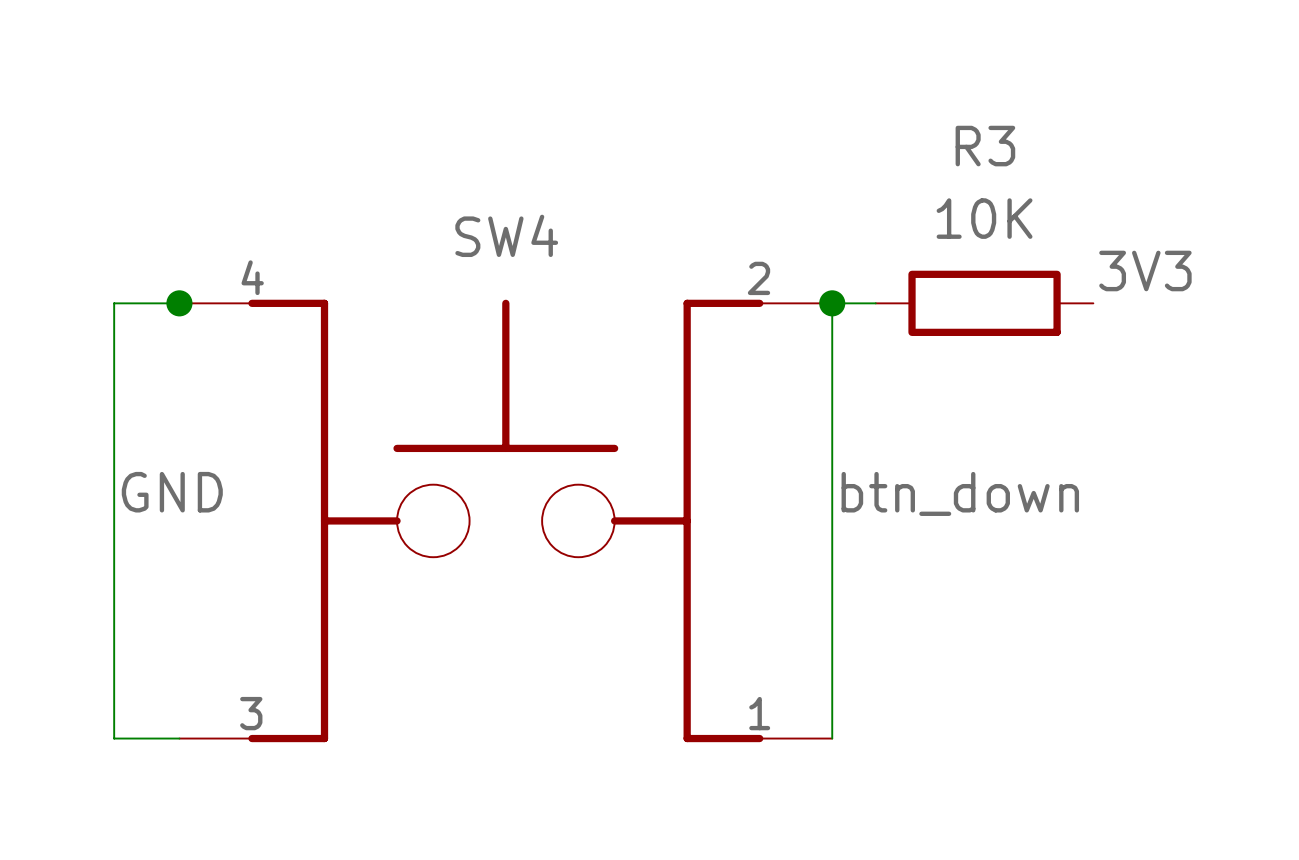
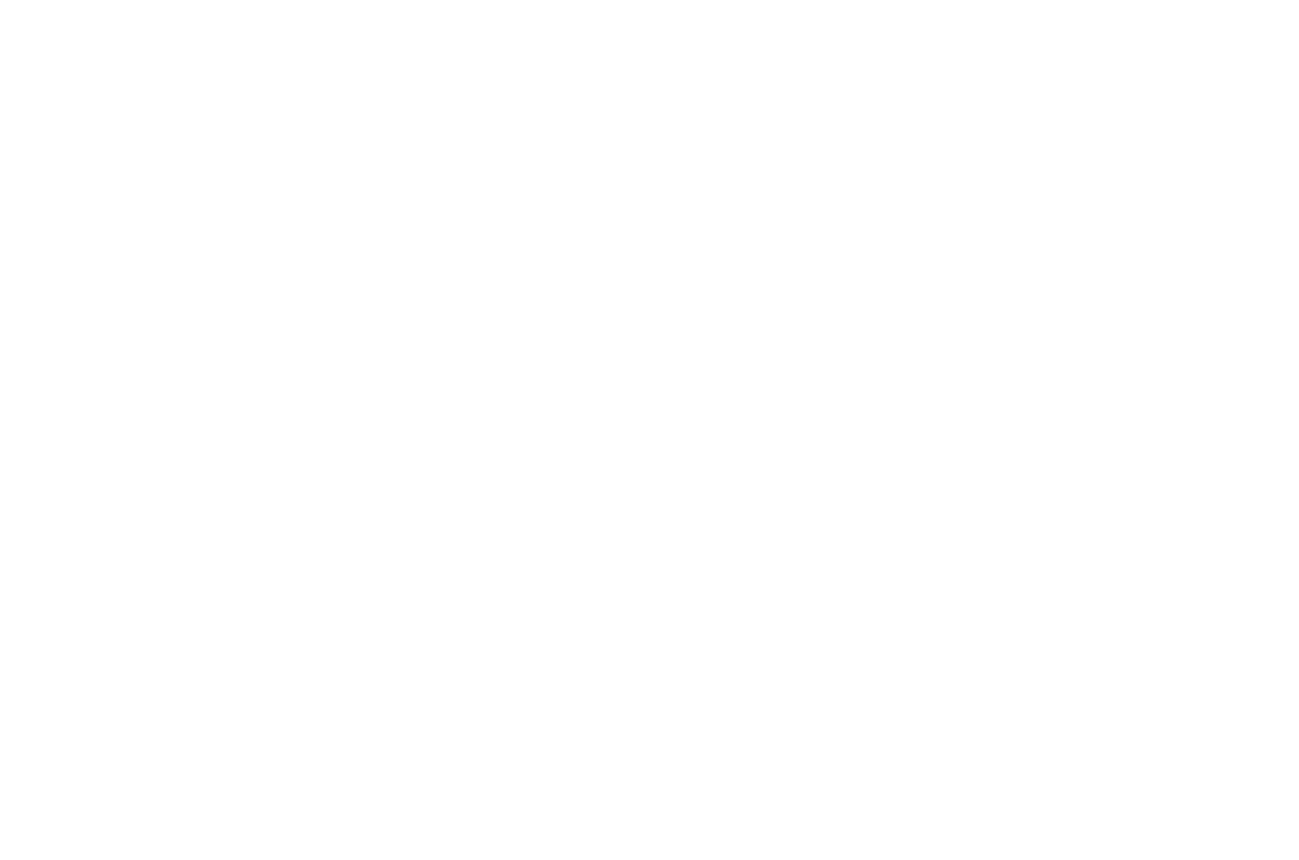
label: 3V3 (1145, 270) -> none
junction: (179, 303) -> none
wire: (183, 303) (114, 303) (114, 738) (179, 738) -> none
junction: (832, 303) -> none
wire: (875, 303) (832, 303) (832, 738) -> none
R3: 10K (984, 303) -> none
label: GND (172, 492) -> none
label: btn_down (960, 493) -> none
SW4: (505, 520) -> none

